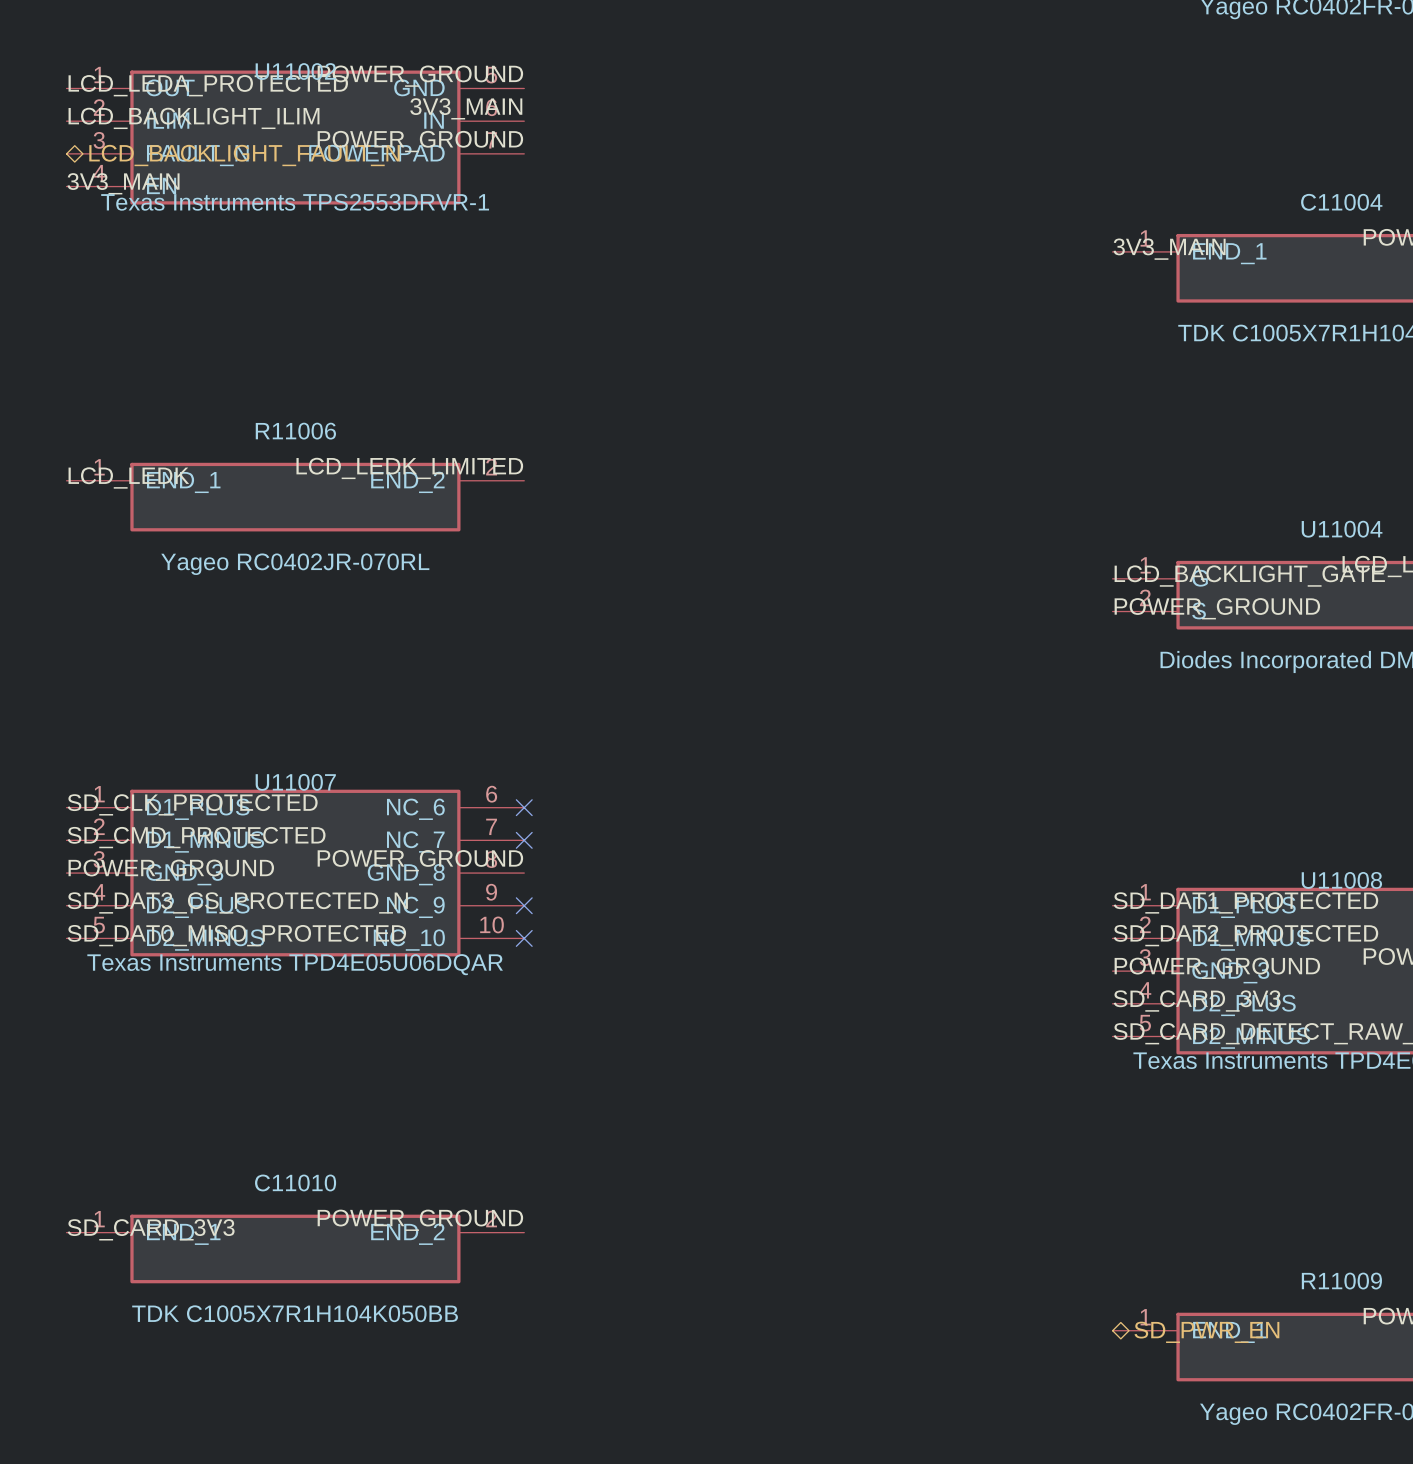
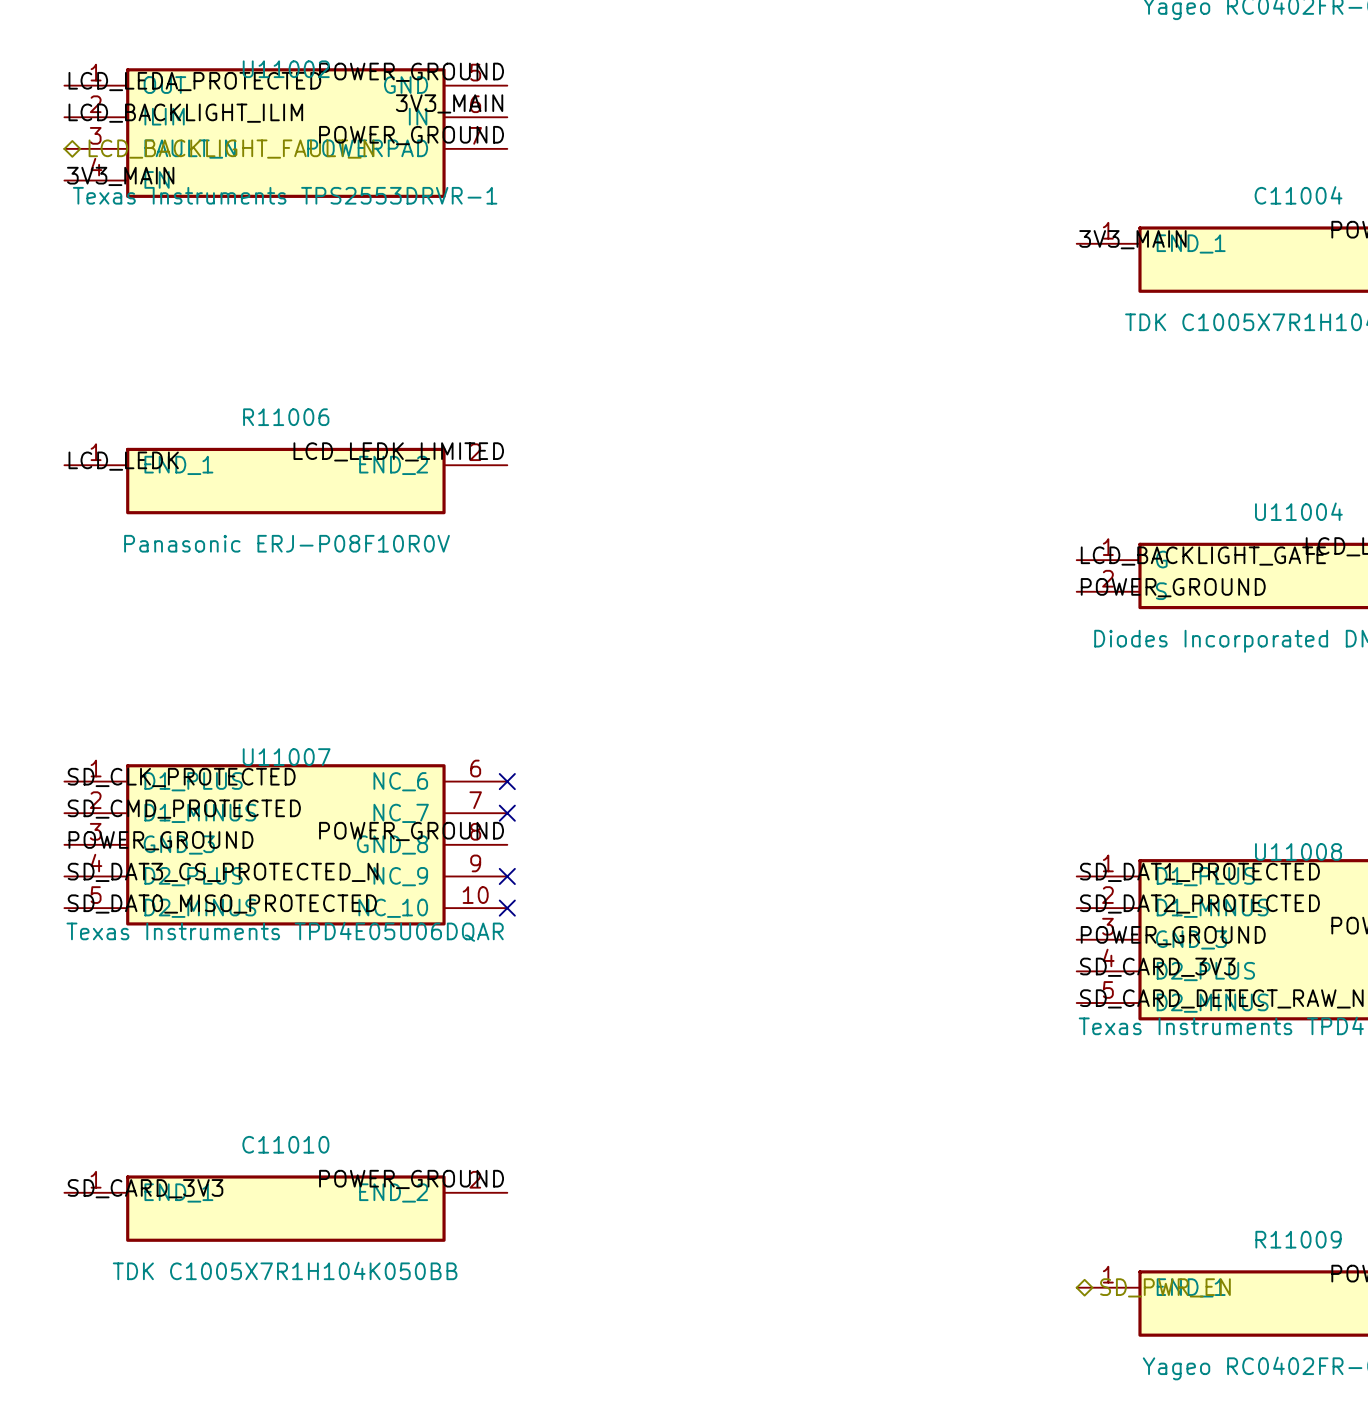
R11006 value: Yageo RC0402JR-070RL (295, 564) -> Panasonic ERJ-P08F10R0V (287, 543)

